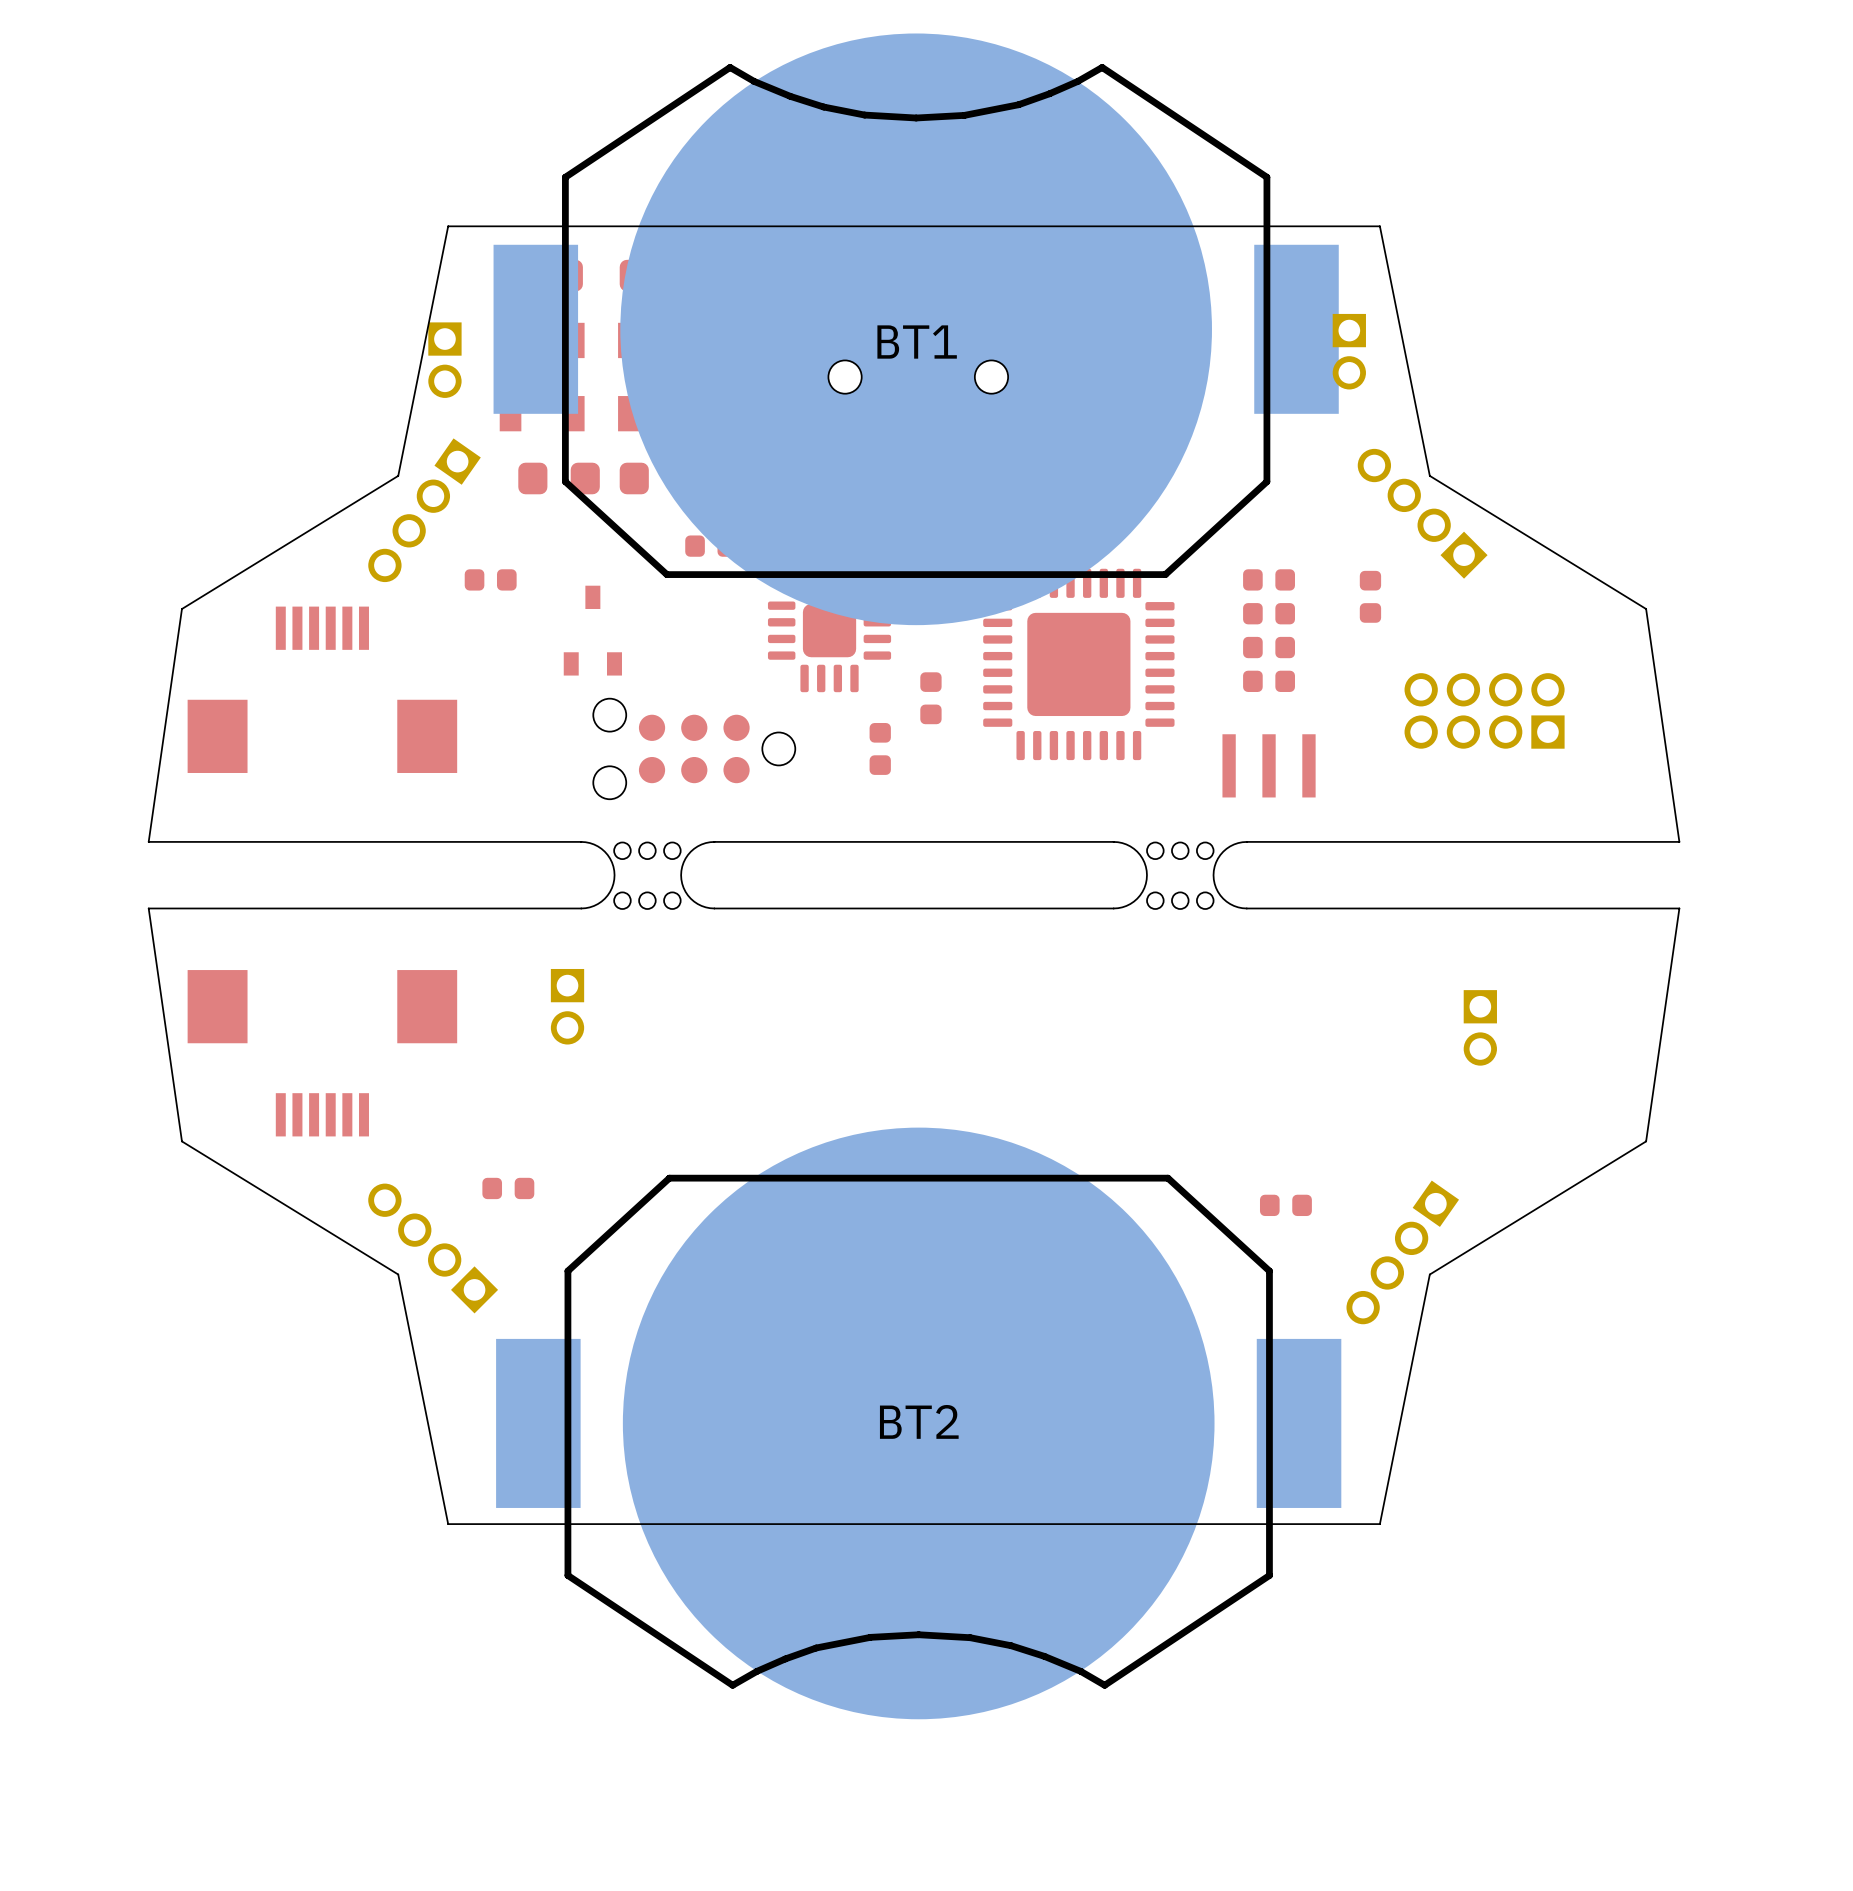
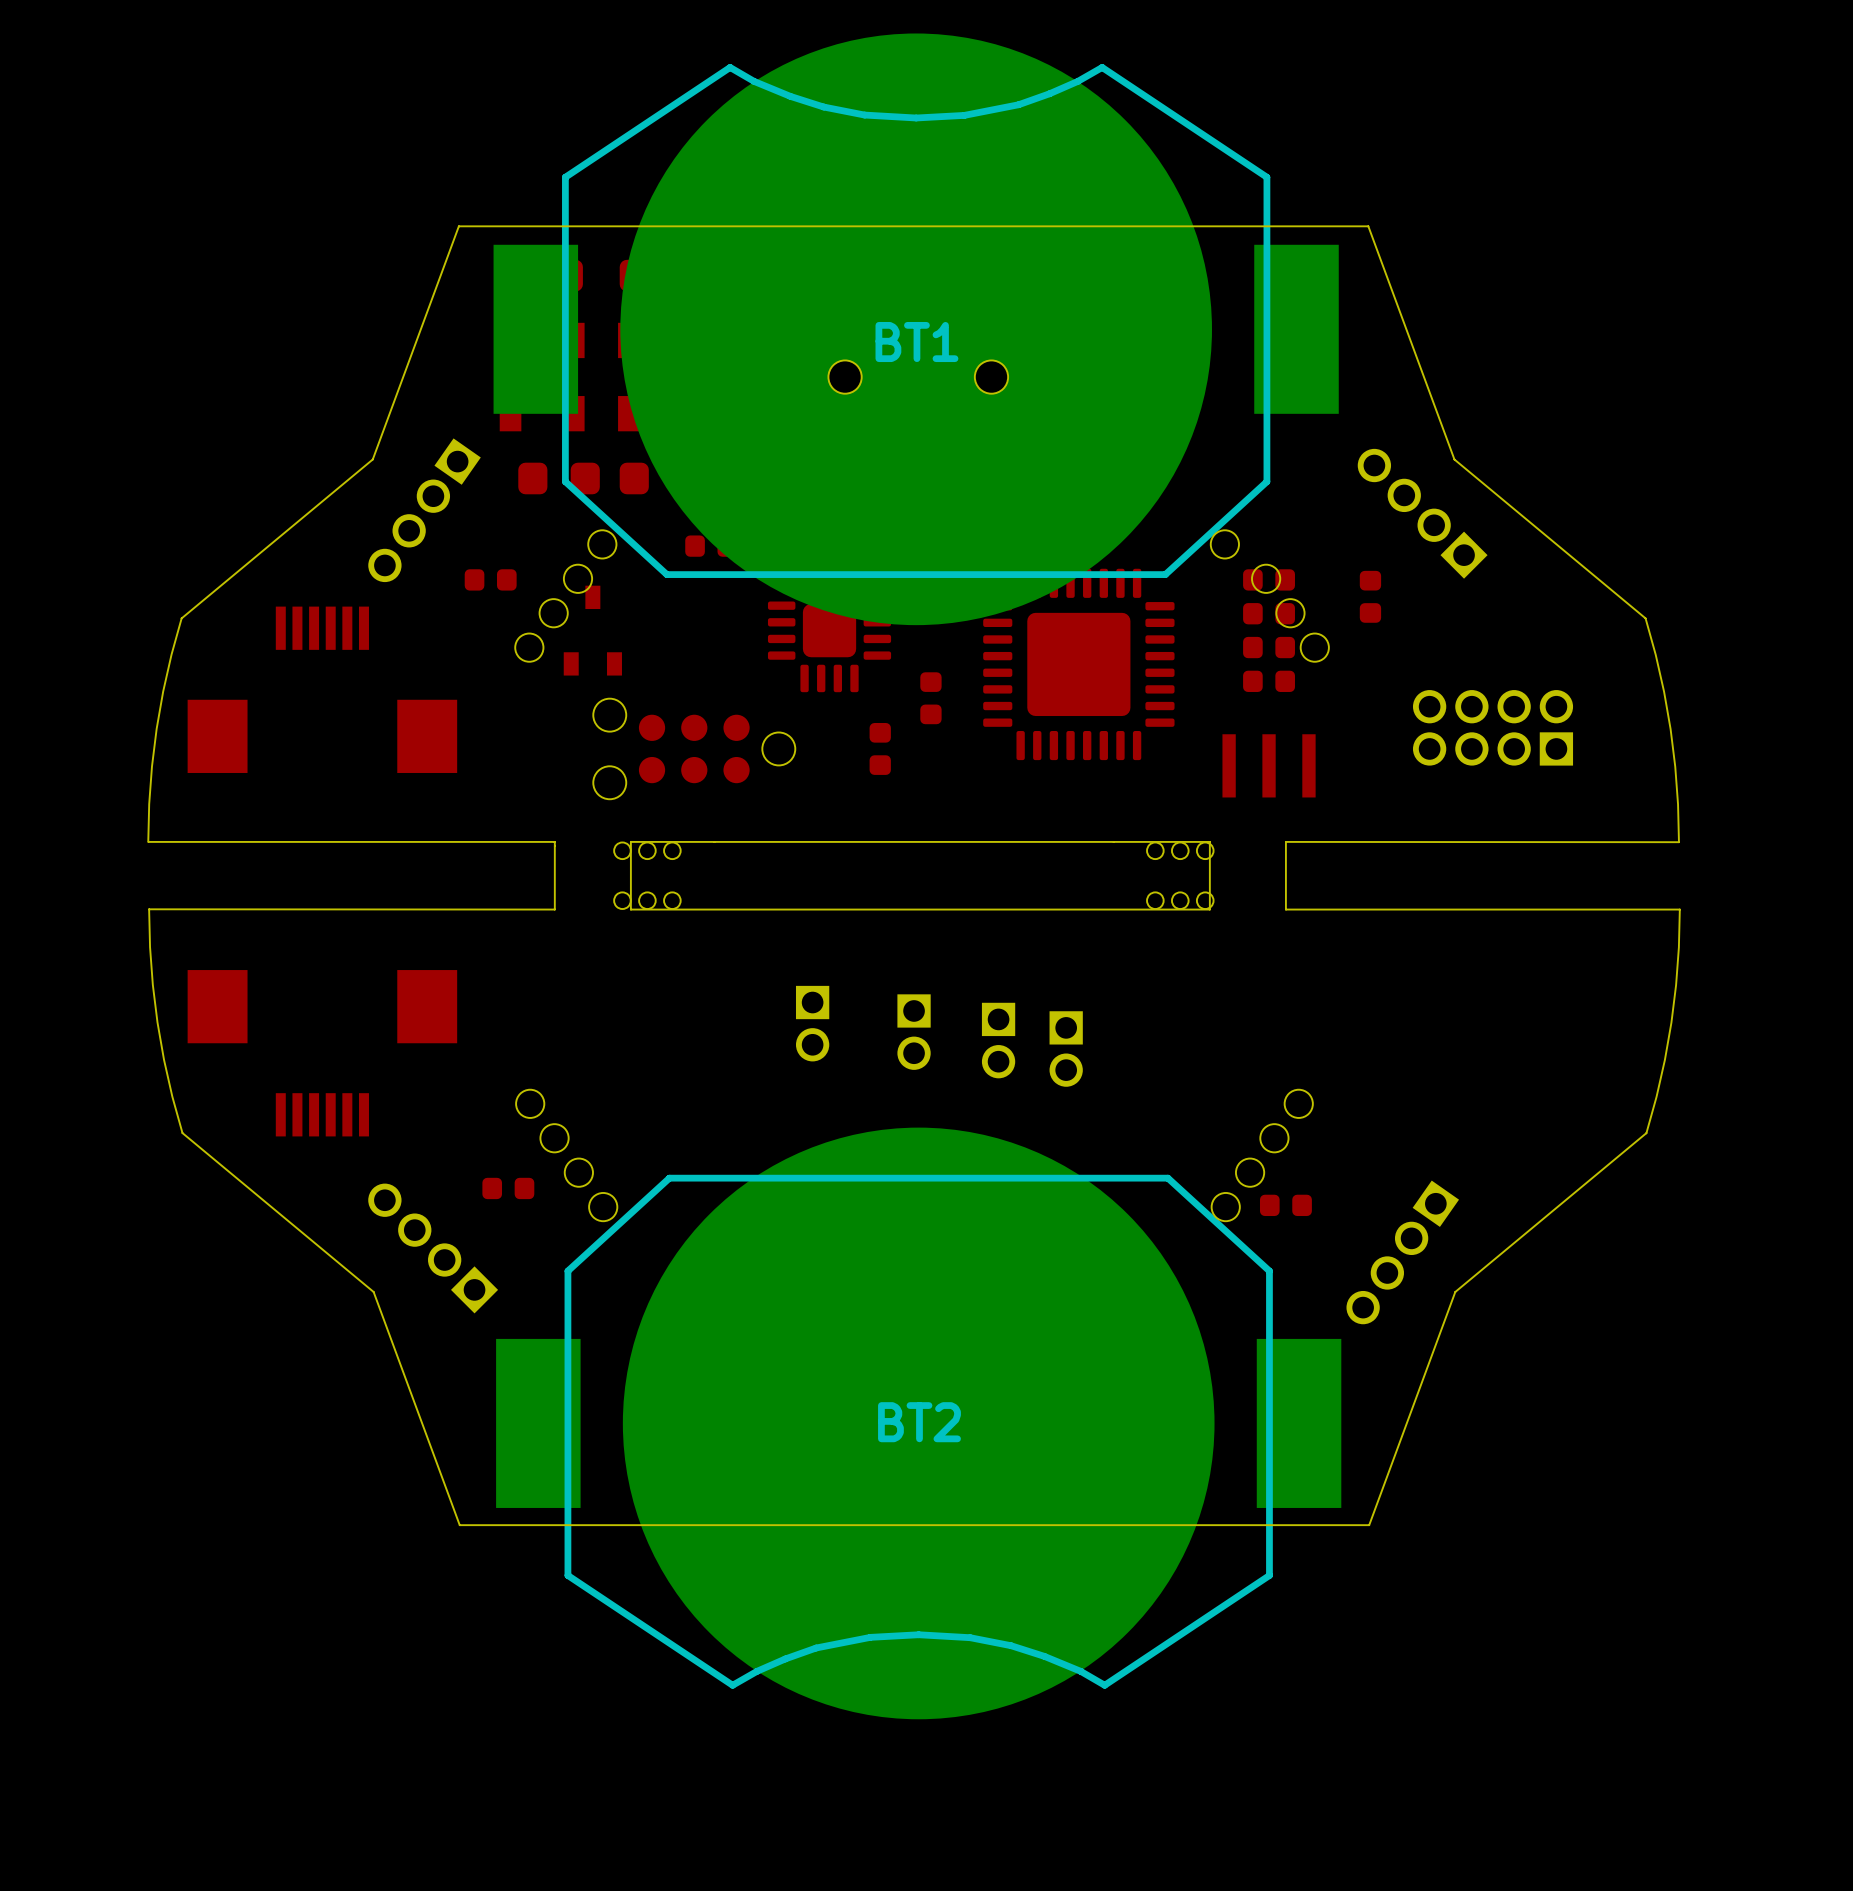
board edge: (458, 226) (448, 226) (398, 475) (181, 609) (148, 841) -> (458, 226) (372, 459) (181, 618)
board edge: (1368, 226) (1379, 226) (1429, 475) (1646, 609) (1679, 841) (1246, 841) (1234, 844) (1226, 848) (1216, 862) (1213, 875) (1217, 891) (1226, 901) (1242, 908) (1679, 908) (1646, 1141) (1429, 1274) (1379, 1524) (448, 1524) (398, 1274) (181, 1141) (148, 908) (581, 908) (594, 905) (601, 901) (610, 891) (614, 879) (613, 866) (607, 854) (601, 848) (589, 843) (554, 841) -> (1646, 1133) (1455, 1291) (1369, 1525) (459, 1525) (373, 1291) (182, 1133) (172, 1096) (157, 1022) (152, 984) (149, 909) (554, 909) (554, 841)
board edge: none -> (1368, 226) (1454, 459) (1645, 618) (1655, 654) (1670, 729) (1678, 804) (1678, 842) (1285, 841) (1285, 909) (1679, 909) (1678, 947) (1671, 1022) (1656, 1096) (1646, 1133)
part: (1349, 351) -> none
part: (444, 360) -> none
round board edge: none -> [587, 529, 617, 559]
round board edge: none -> [1210, 529, 1240, 559]
round board edge: none -> [563, 564, 593, 594]
round board edge: none -> [1251, 564, 1281, 594]
round board edge: none -> [539, 598, 569, 628]
round board edge: none -> [1275, 598, 1306, 628]
board edge: none -> (181, 618) (171, 654) (156, 728) (152, 766) (148, 841)
round board edge: none -> [514, 633, 544, 663]
round board edge: none -> [1300, 633, 1330, 663]
part position: (1484, 710) -> (1493, 727)
board edge: (1113, 841) (1126, 844) (1137, 851) (1144, 862) (1146, 875) (1144, 887) (1137, 898) (1126, 905) (1113, 908) (710, 908) (697, 904) (687, 895) (682, 883) (681, 870) (685, 858) (690, 851) (701, 844) (714, 841) -> (1113, 841) (1209, 841) (1209, 909) (630, 909) (630, 841) (714, 841)
part: (567, 1006) -> none
part: none -> (812, 1023)
part: (1480, 1027) -> none
part: none -> (914, 1032)
part: none -> (998, 1040)
part: none -> (1066, 1049)
round board edge: none -> [515, 1089, 545, 1119]
round board edge: none -> [1284, 1089, 1314, 1119]
round board edge: none -> [539, 1123, 570, 1153]
round board edge: none -> [1259, 1123, 1289, 1153]
round board edge: none -> [564, 1158, 594, 1188]
round board edge: none -> [1235, 1158, 1265, 1188]
round board edge: none -> [588, 1192, 618, 1222]
round board edge: none -> [1211, 1192, 1241, 1222]

